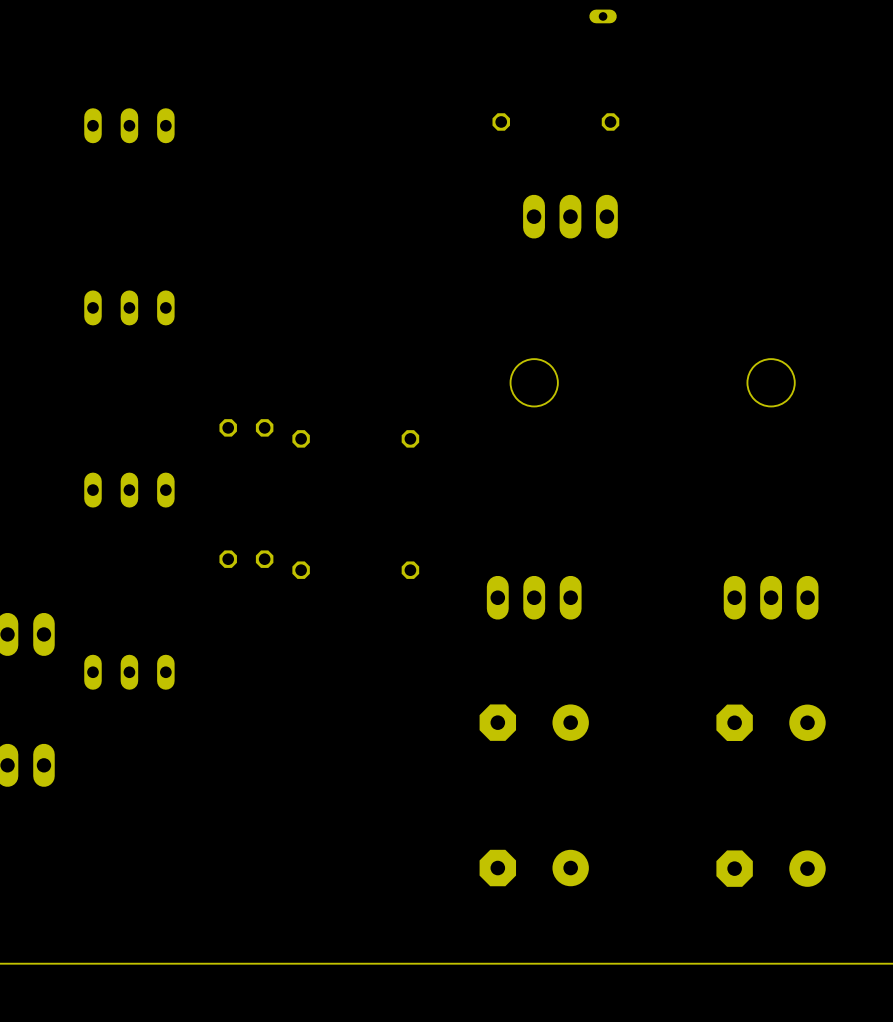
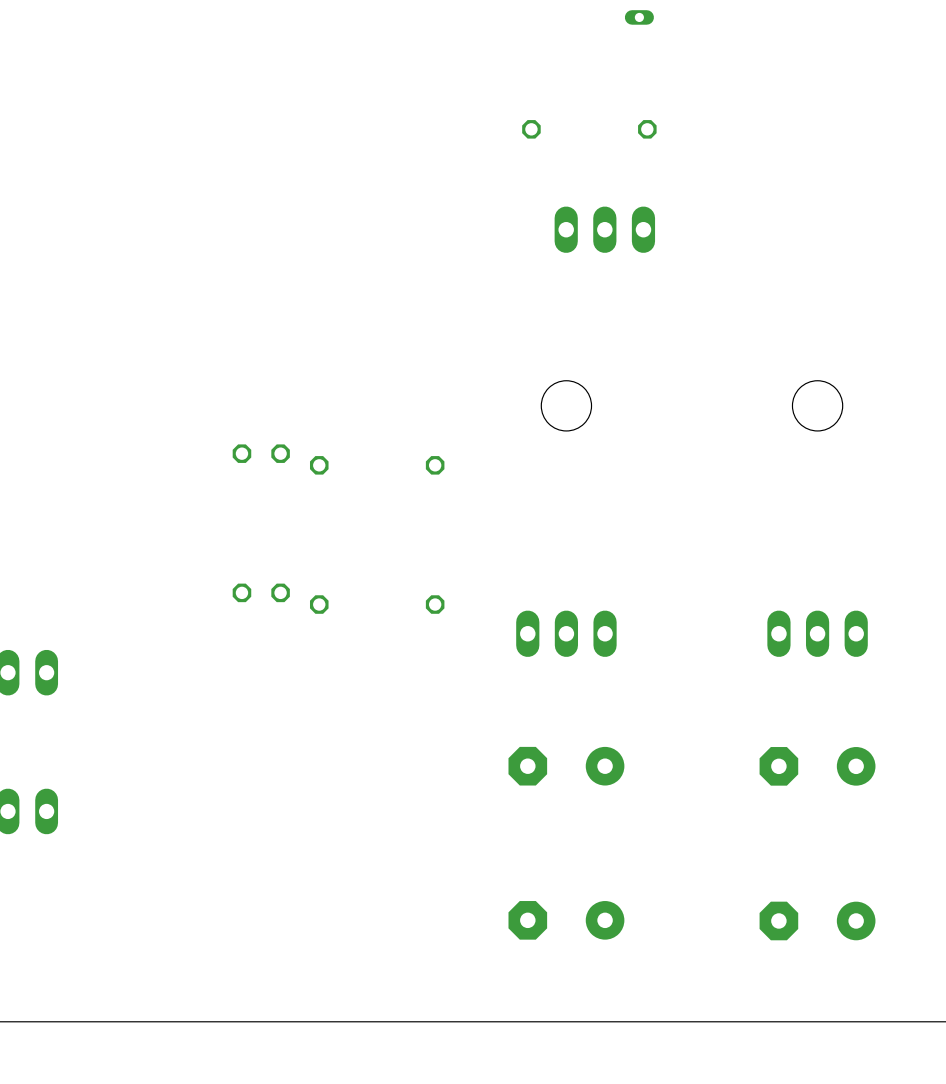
part: (129, 125) -> none
part: (129, 307) -> none
part: (129, 490) -> none
part: (129, 672) -> none

